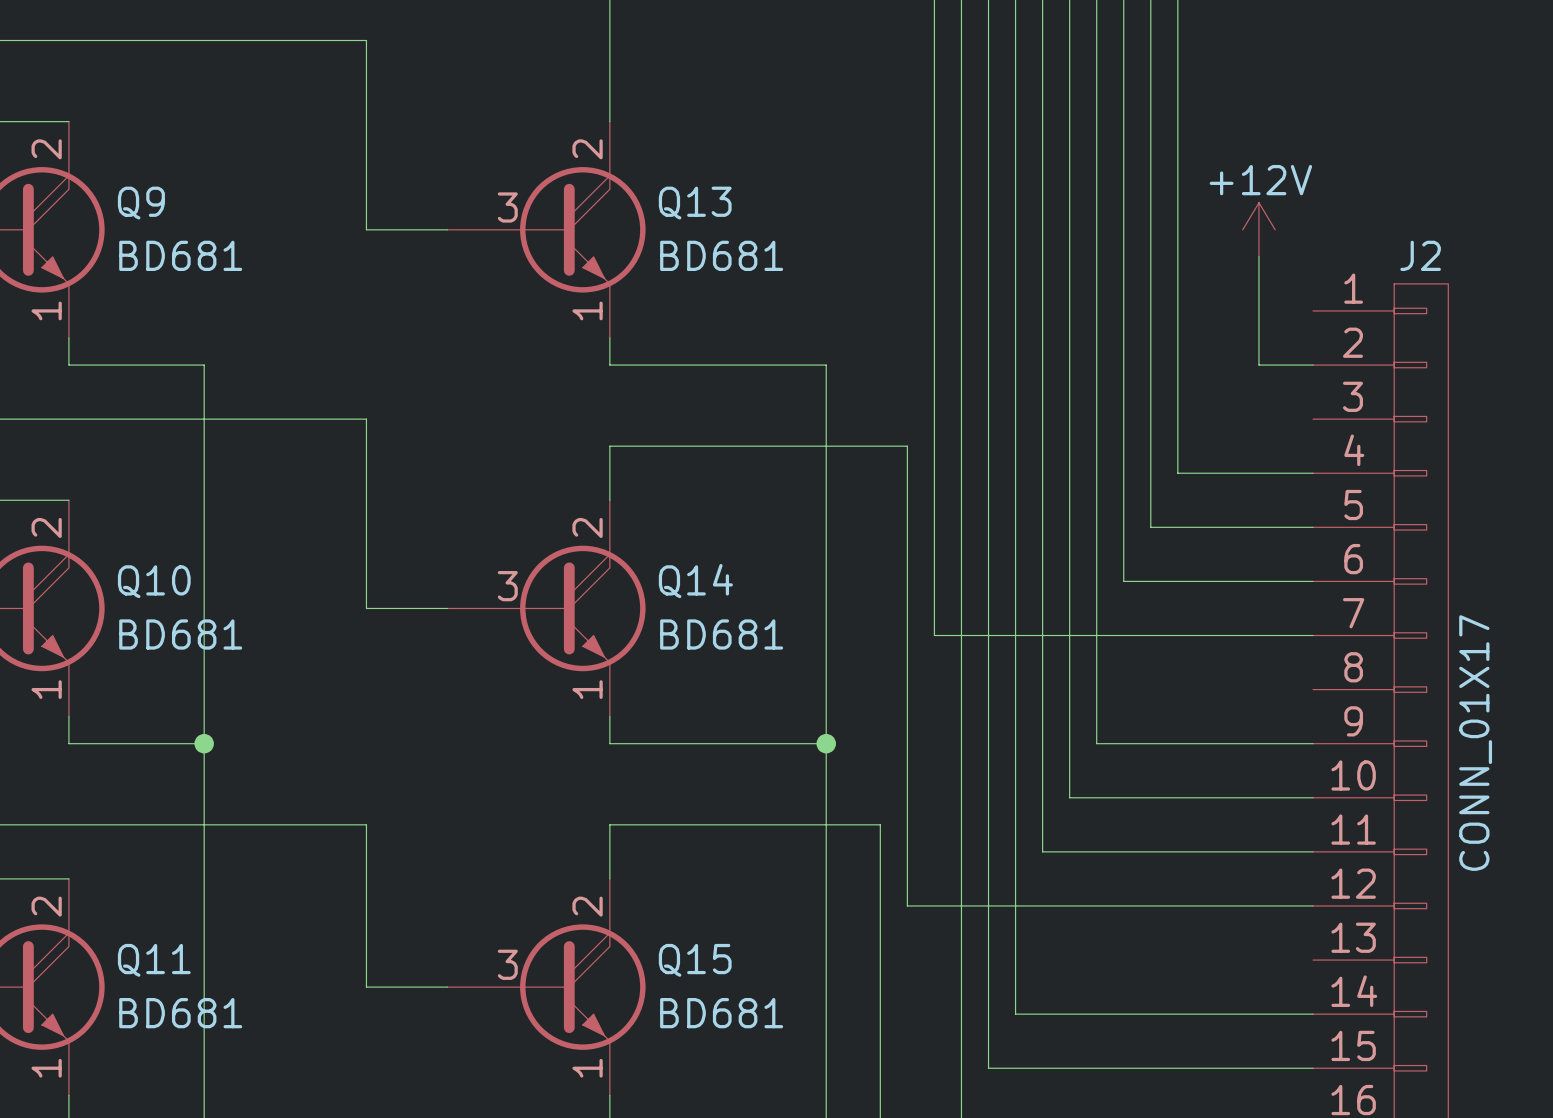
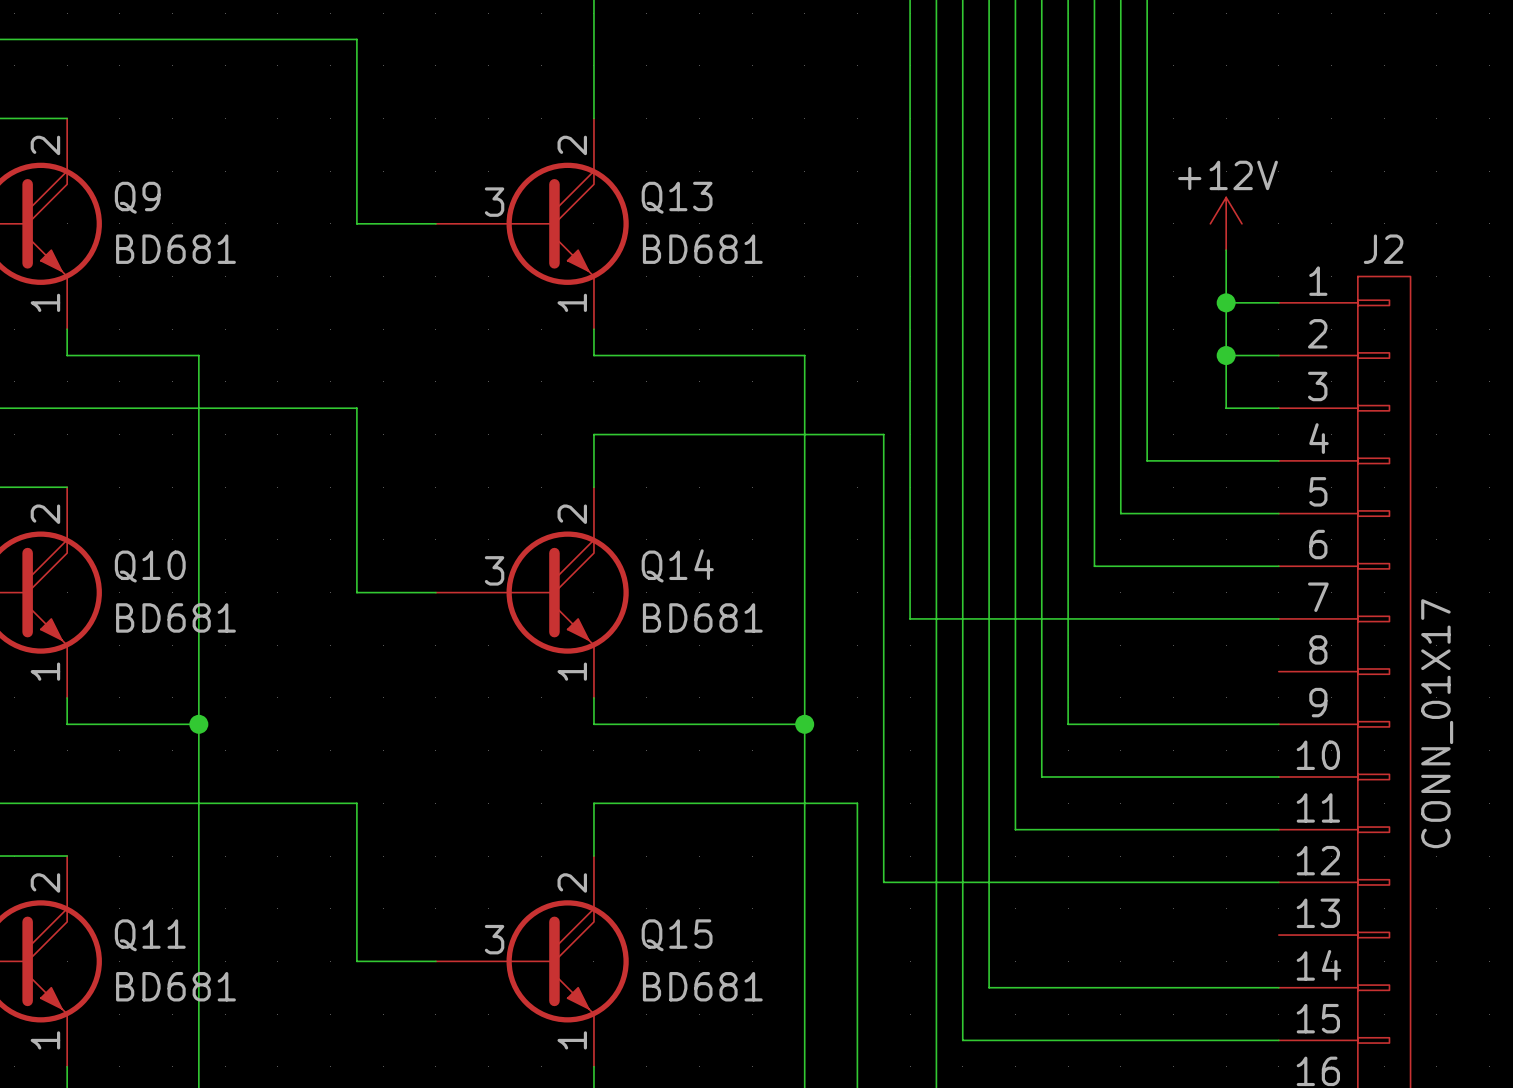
wire: none -> (1226, 302) (1278, 302)
junction: none -> (1226, 302)
wire: none -> (1226, 355) (1226, 408) (1278, 408)
junction: none -> (1226, 355)

